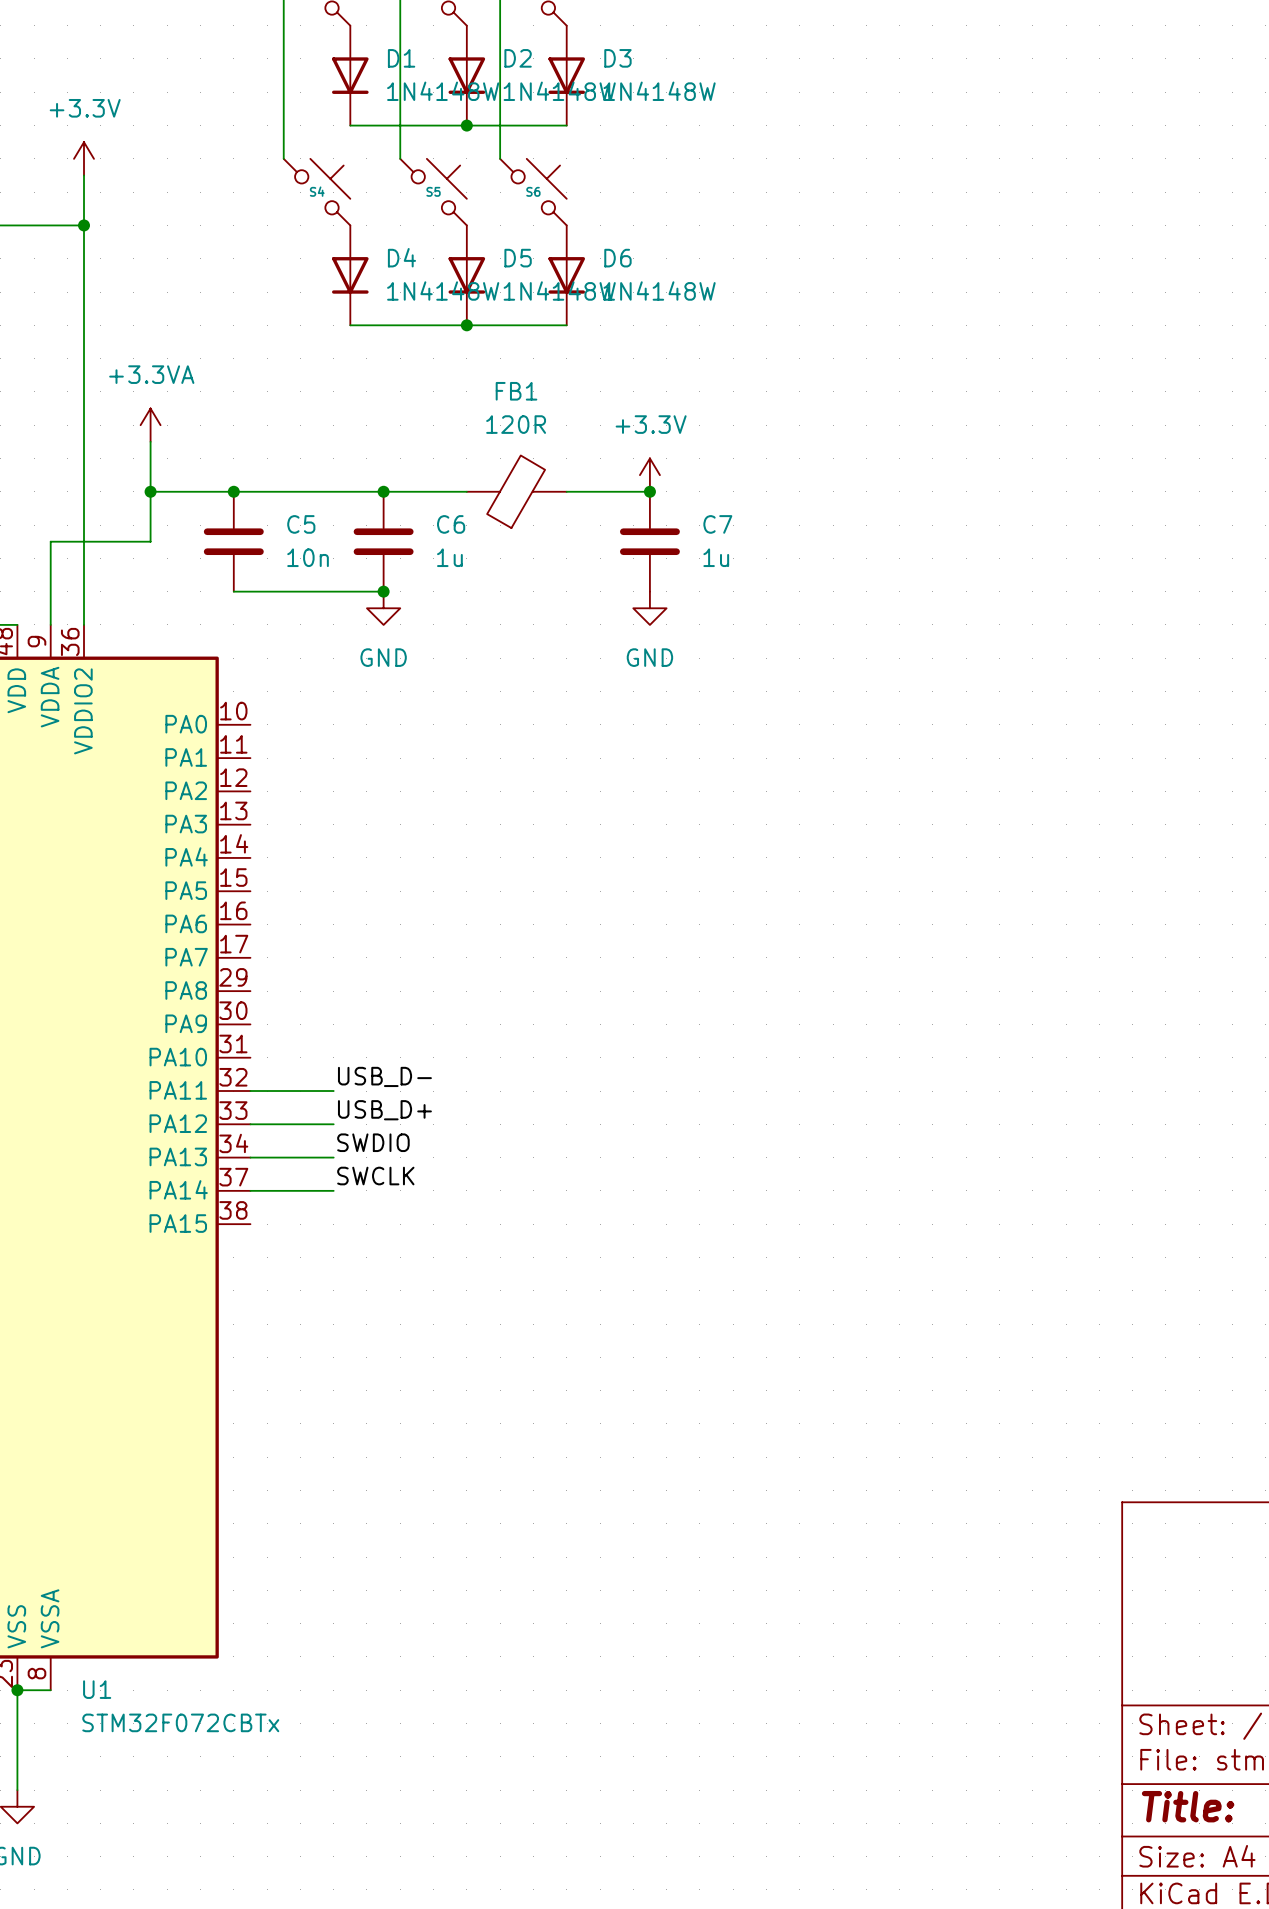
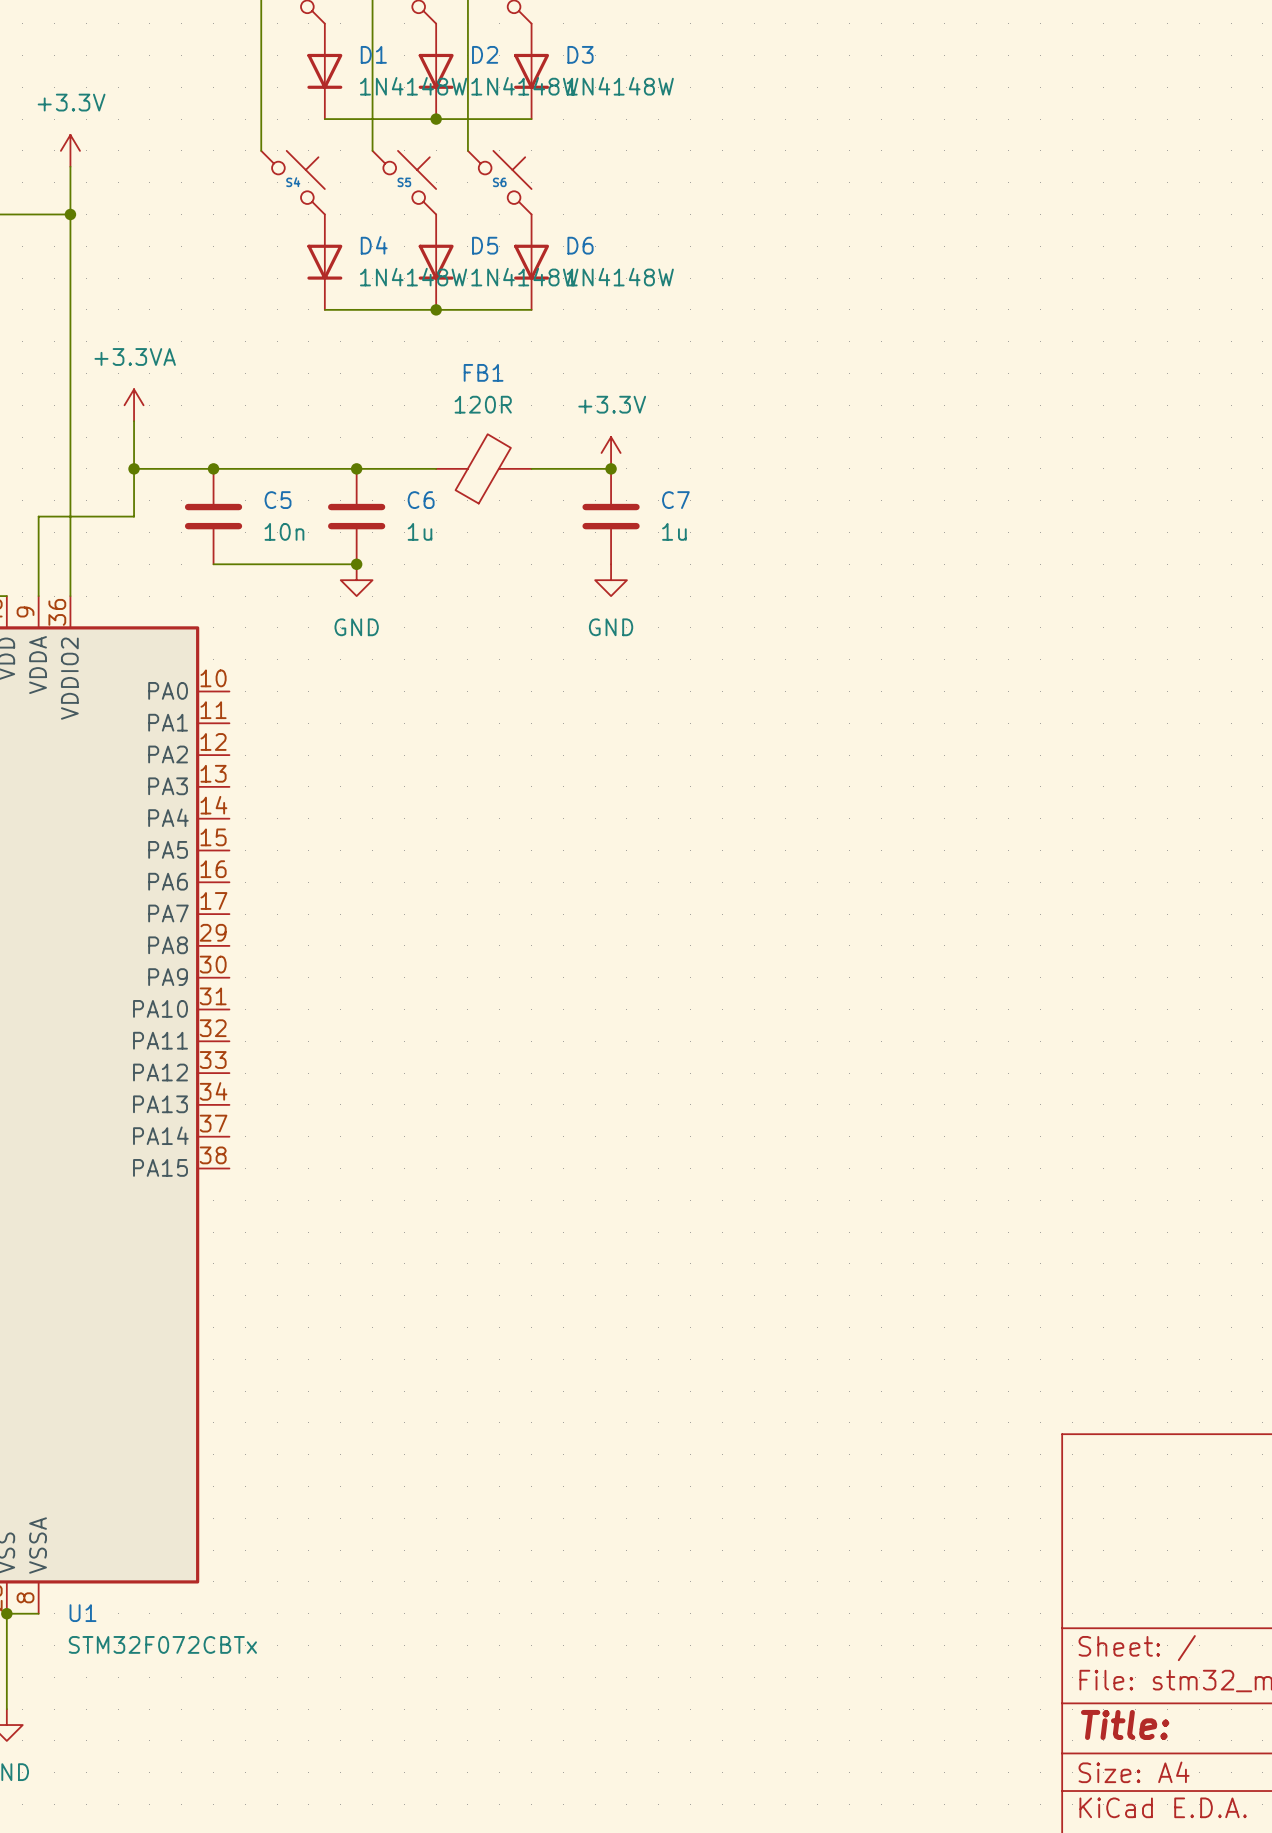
label: USB_D- (384, 1076) -> none
wire: (250, 1091) (333, 1091) -> none
label: USB_D+ (384, 1110) -> none
wire: (250, 1124) (333, 1124) -> none
label: SWDIO (373, 1142) -> none
wire: (250, 1157) (333, 1157) -> none
label: SWCLK (375, 1176) -> none
wire: (250, 1190) (333, 1190) -> none

